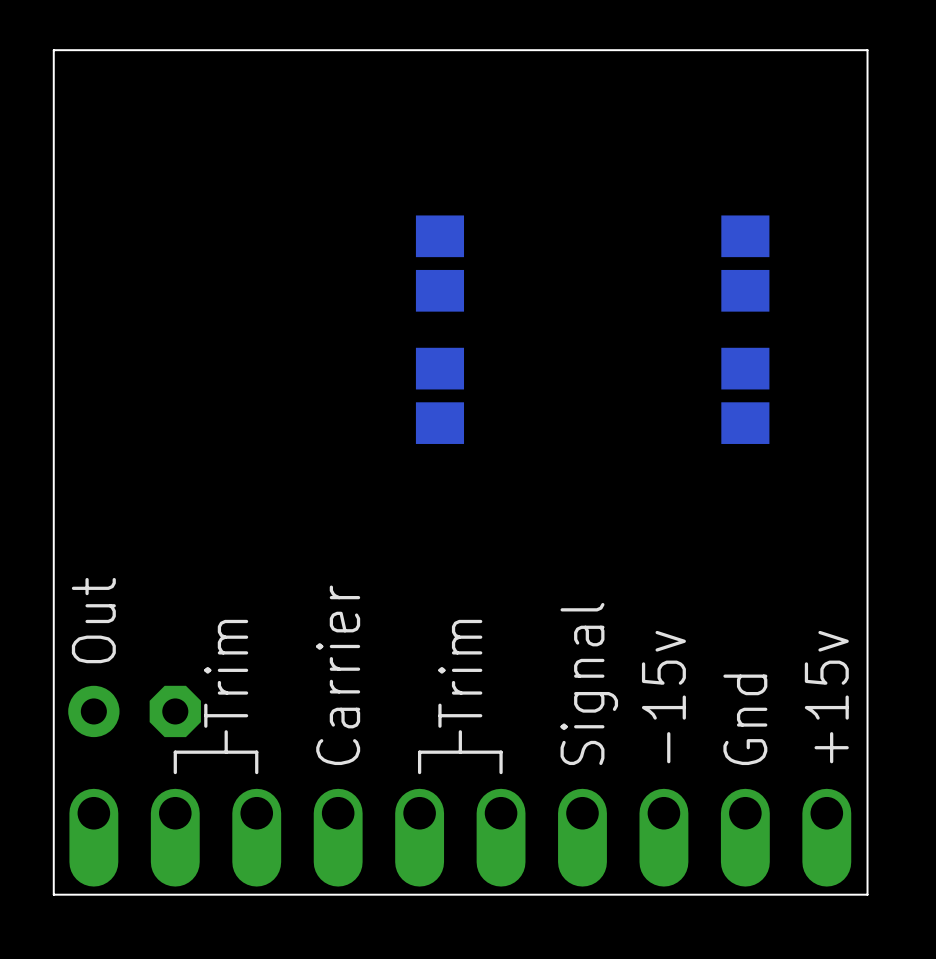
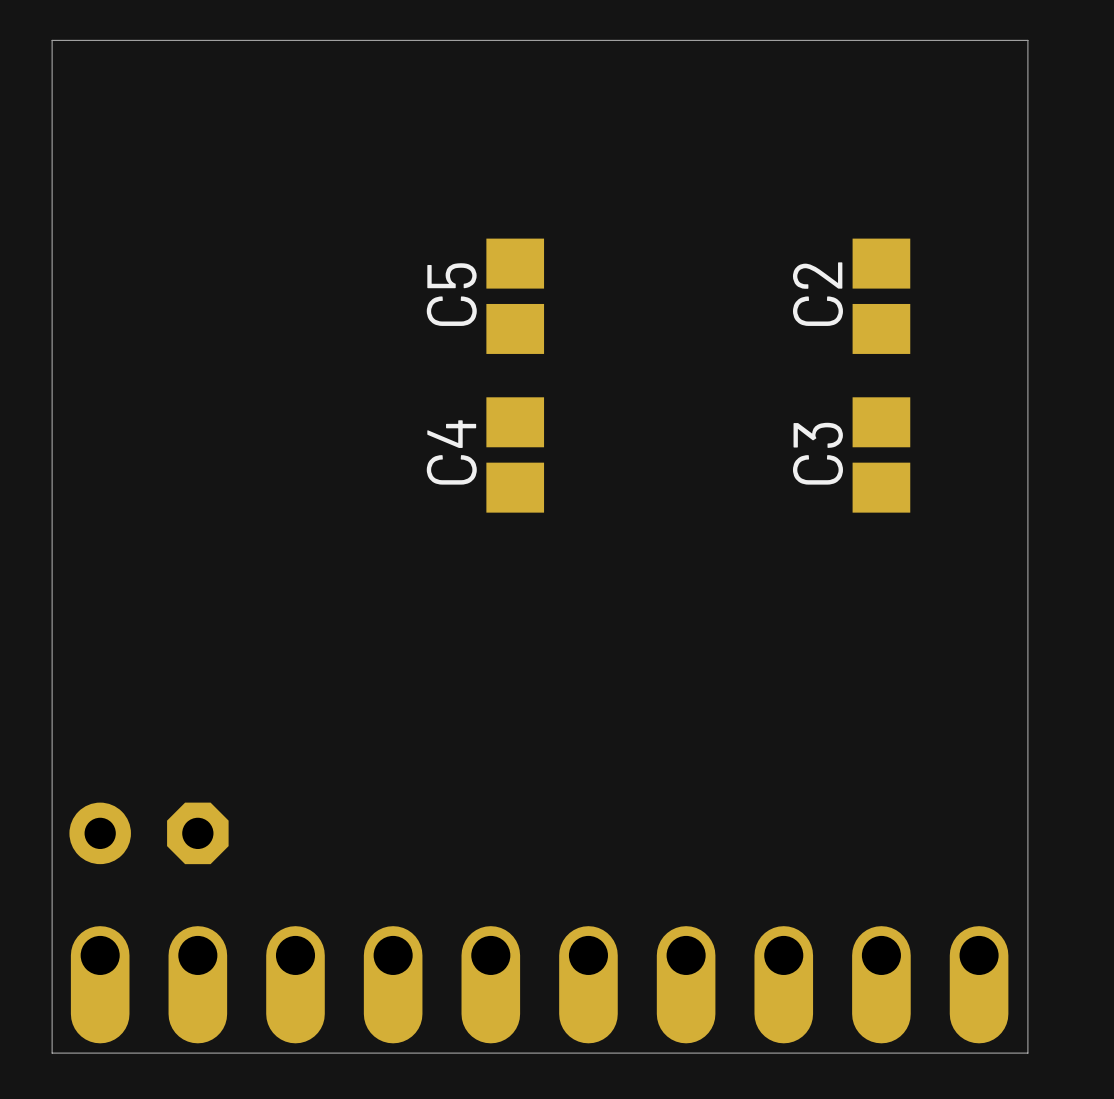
C5 name: none -> C5 (451, 294)
C2 name: none -> C2 (817, 294)
C4 name: none -> C4 (451, 452)
C3 name: none -> C3 (817, 453)
text: Out (93, 620) -> none
text: Trim (226, 673) -> none
text: Trim (460, 673) -> none
text: Carrier (338, 675) -> none
text: Signal (589, 684) -> none
text: -15v (663, 697) -> none
text: +15v (826, 697) -> none
text: Gnd (745, 719) -> none
line: (226, 731) (226, 752) -> none
line: (460, 731) (460, 752) -> none
line: (256, 772) (256, 752) (175, 752) (175, 772) -> none
line: (501, 772) (501, 752) (419, 752) (419, 772) -> none

